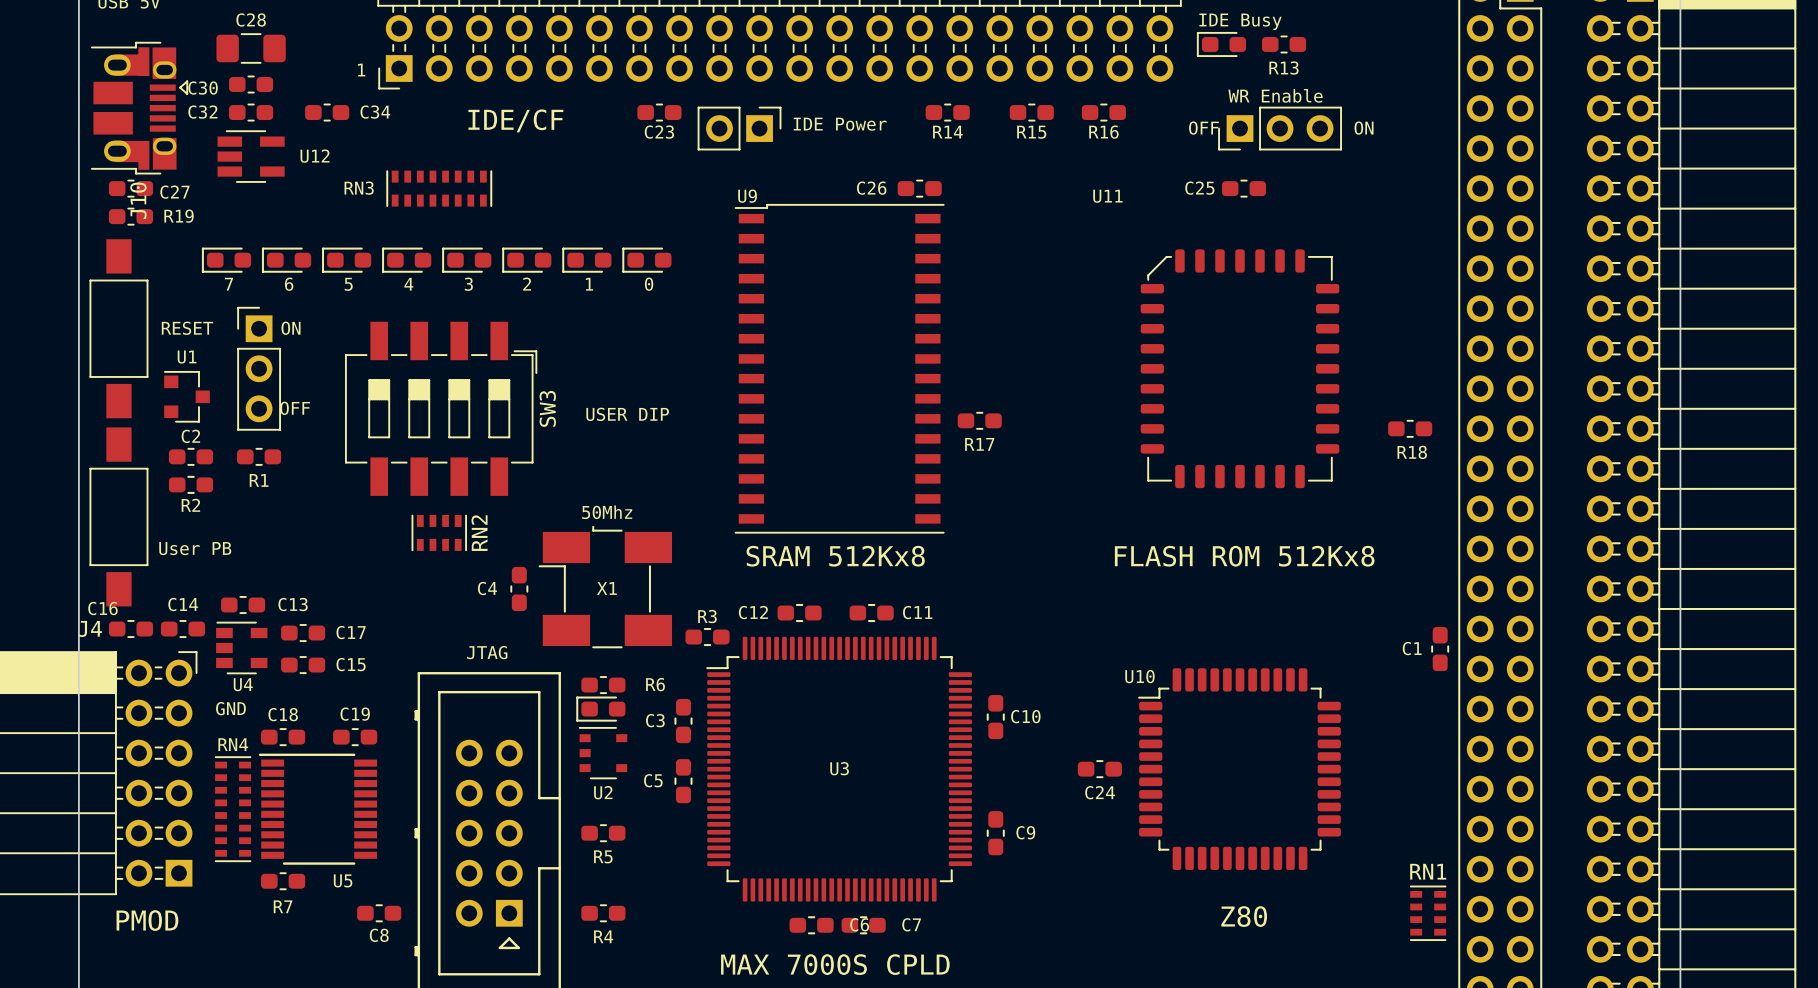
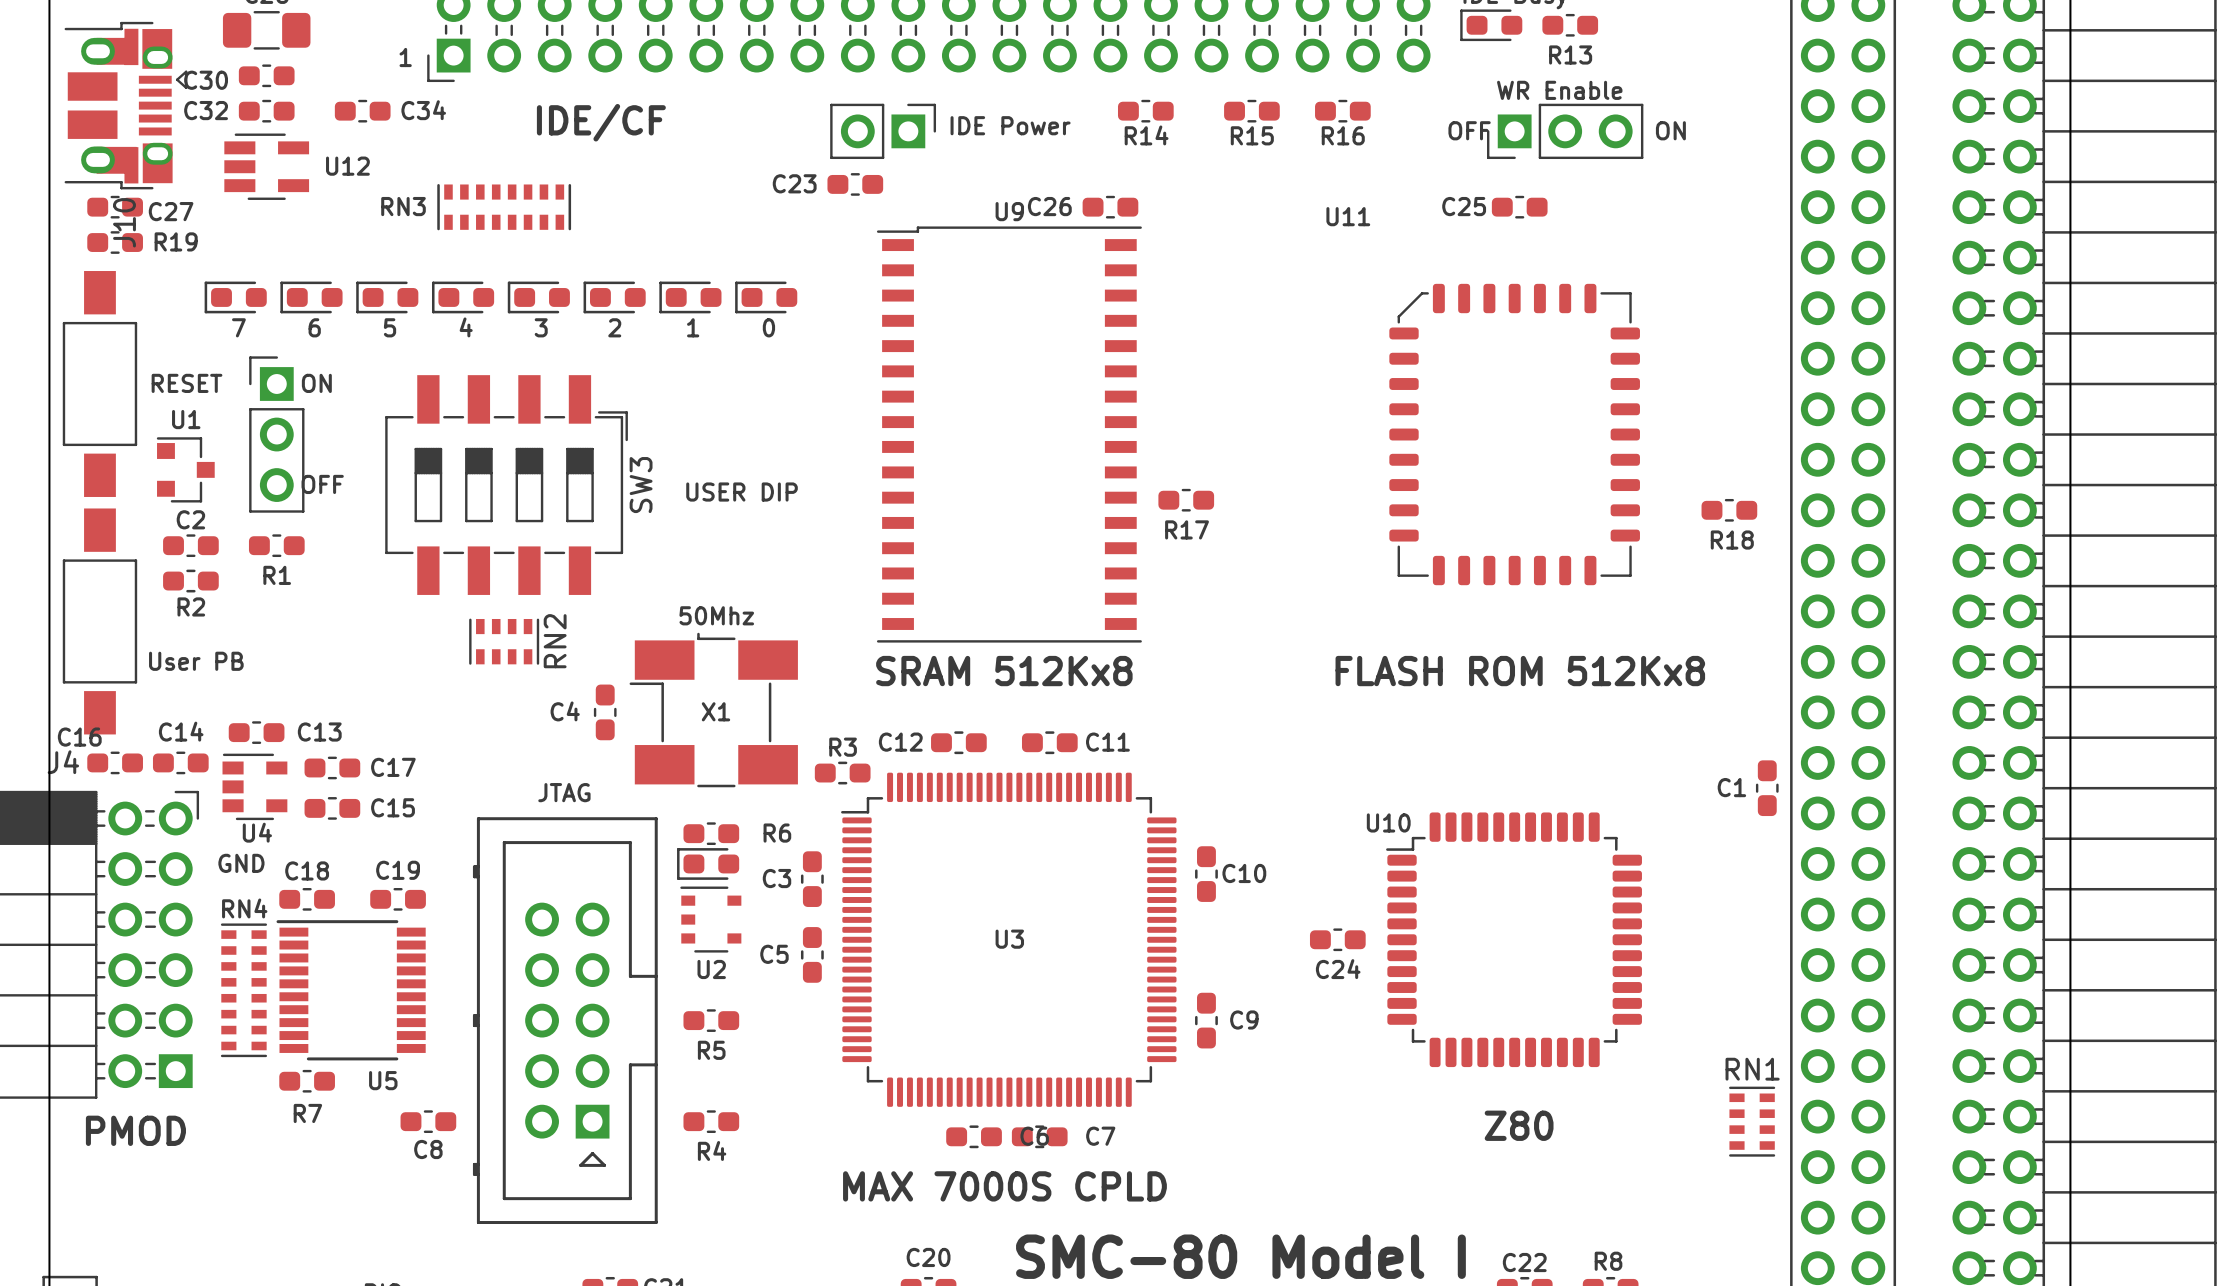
C23 position: (659, 112) -> (855, 184)
C23 name position: C23 (659, 132) -> C23 (794, 183)
U9 name position: U9 (747, 196) -> U9 (1009, 211)

